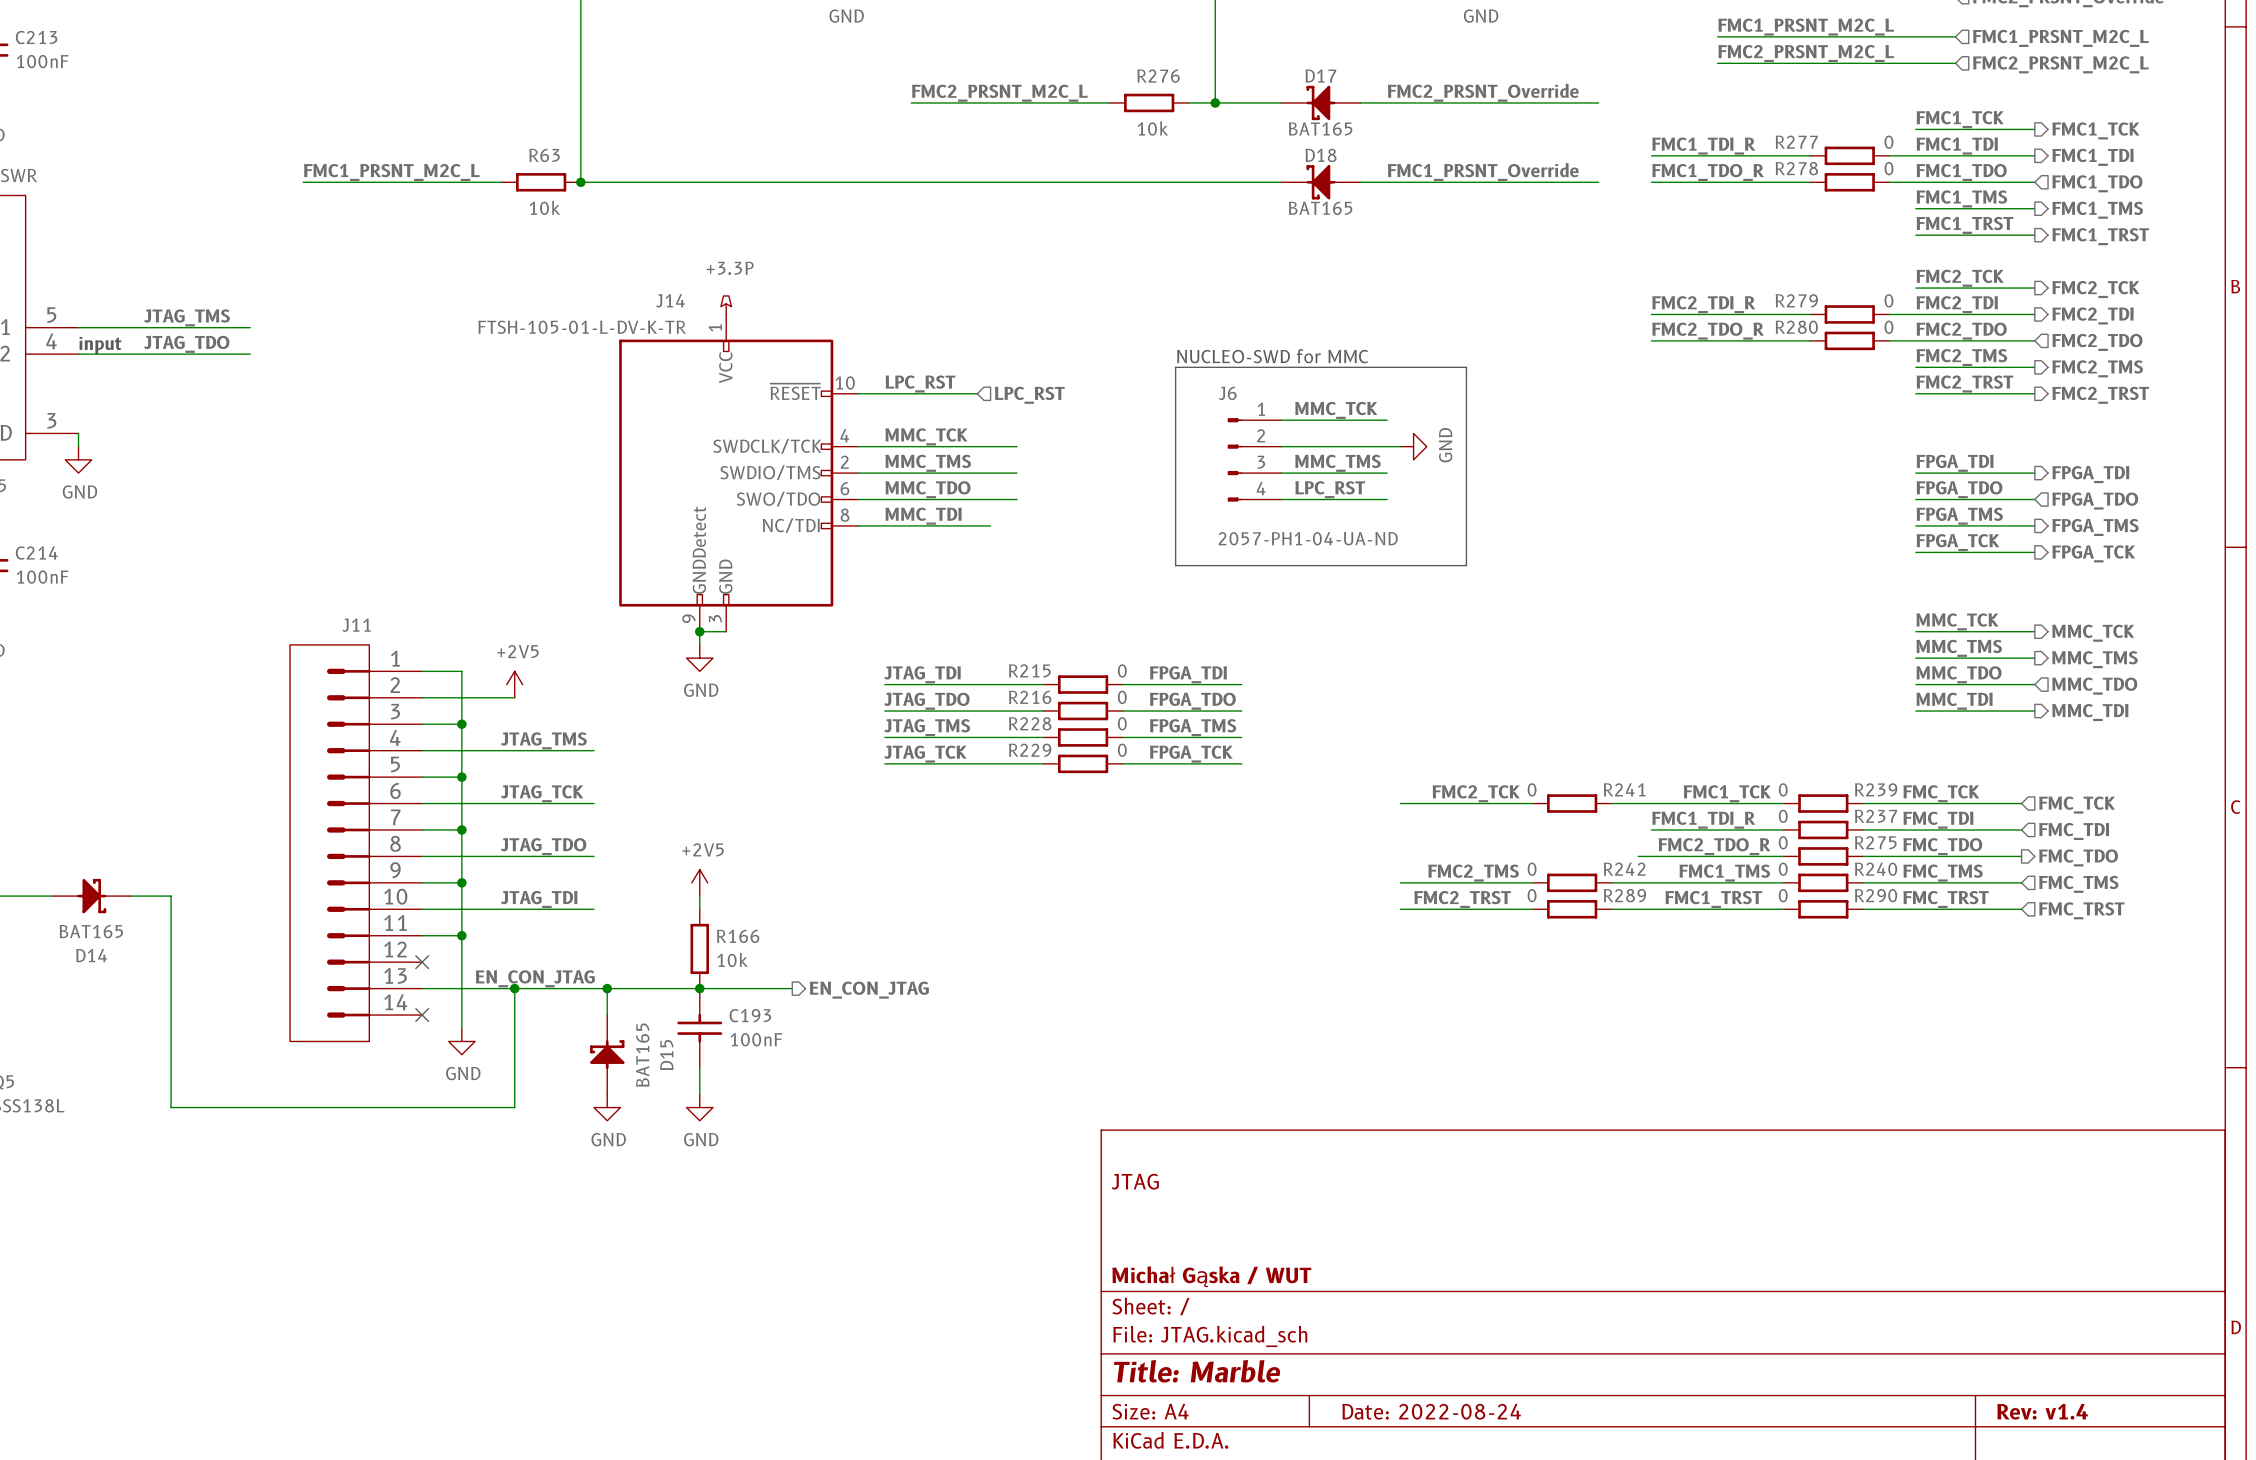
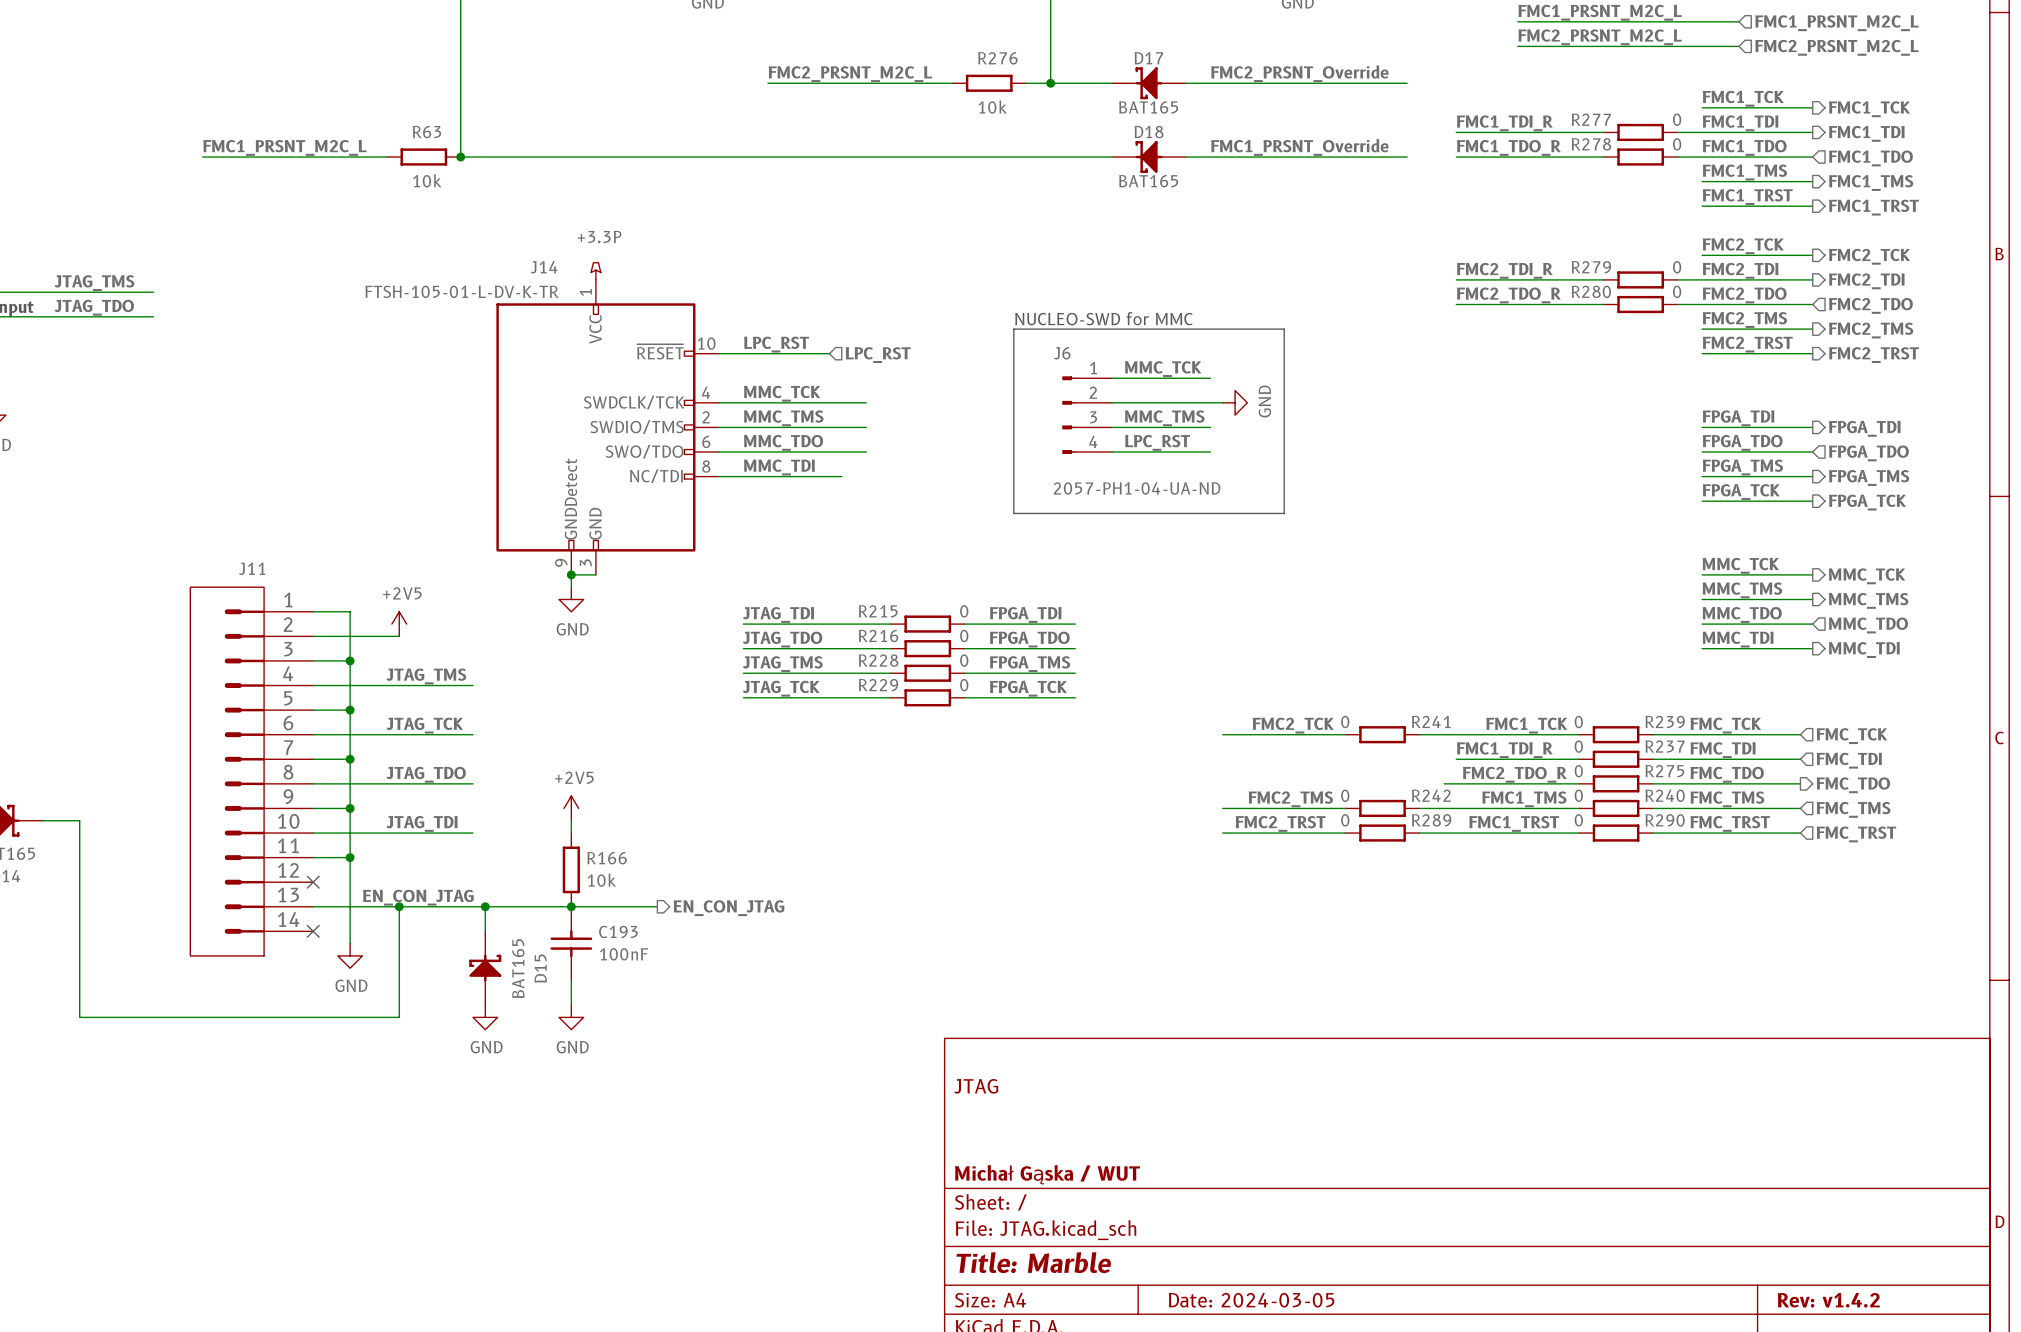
title block: Date: 2022-08-24 (1431, 1411) -> Date: 2024-03-05 (1251, 1300)
title block: Rev: v1.4 (2042, 1411) -> Rev: v1.4.2 (1828, 1300)

